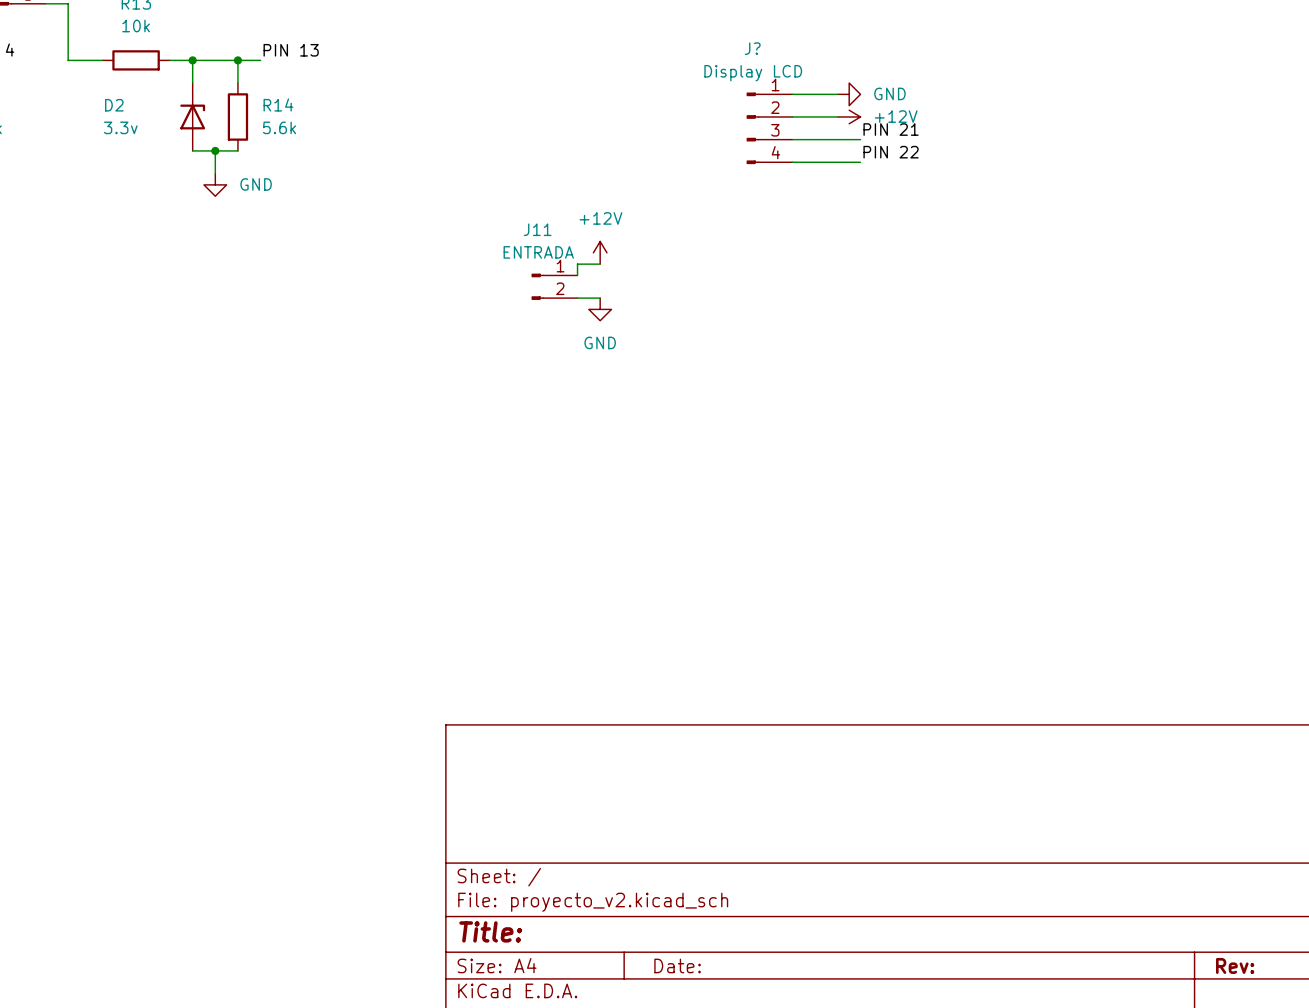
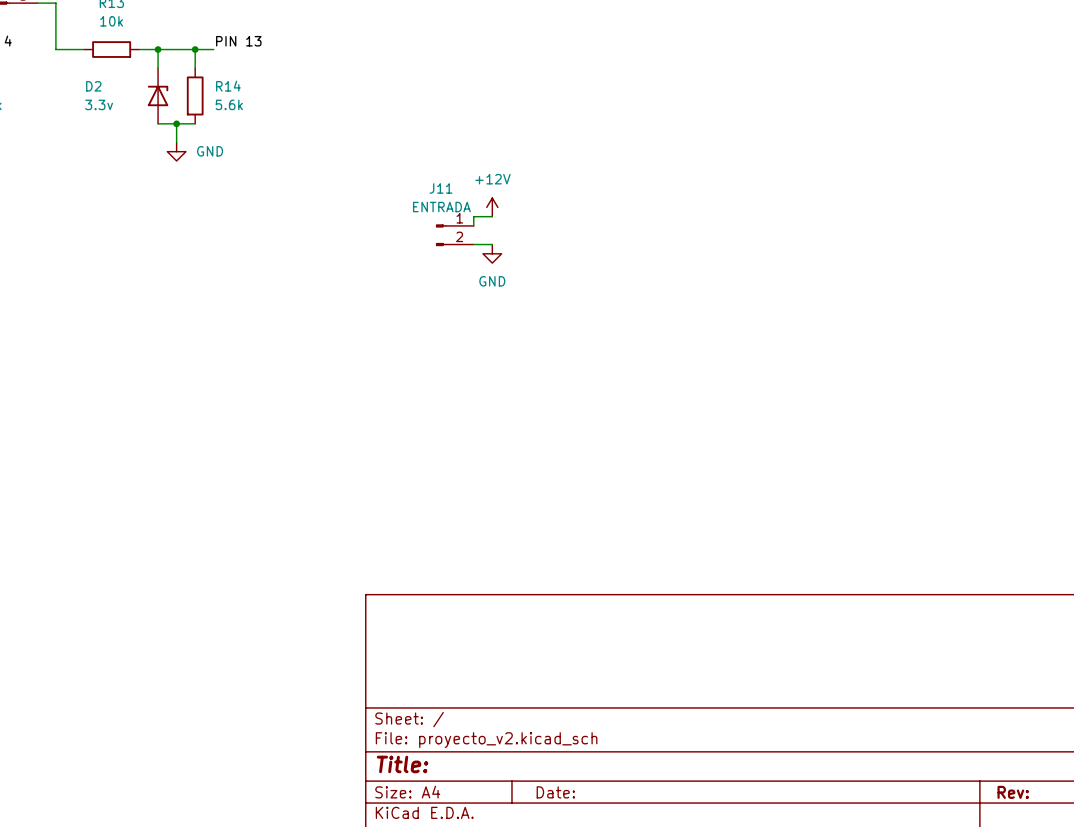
wire: (792, 94) (837, 94) -> none
power symbol: GND (849, 94) -> none
wire: (792, 116) (837, 116) -> none
power symbol: +12V (849, 116) -> none
J?: Display LCD (769, 128) -> none
label: PIN 21 (891, 129) -> none
wire: (792, 139) (860, 139) -> none
label: PIN 22 (891, 152) -> none
wire: (792, 162) (860, 162) -> none

